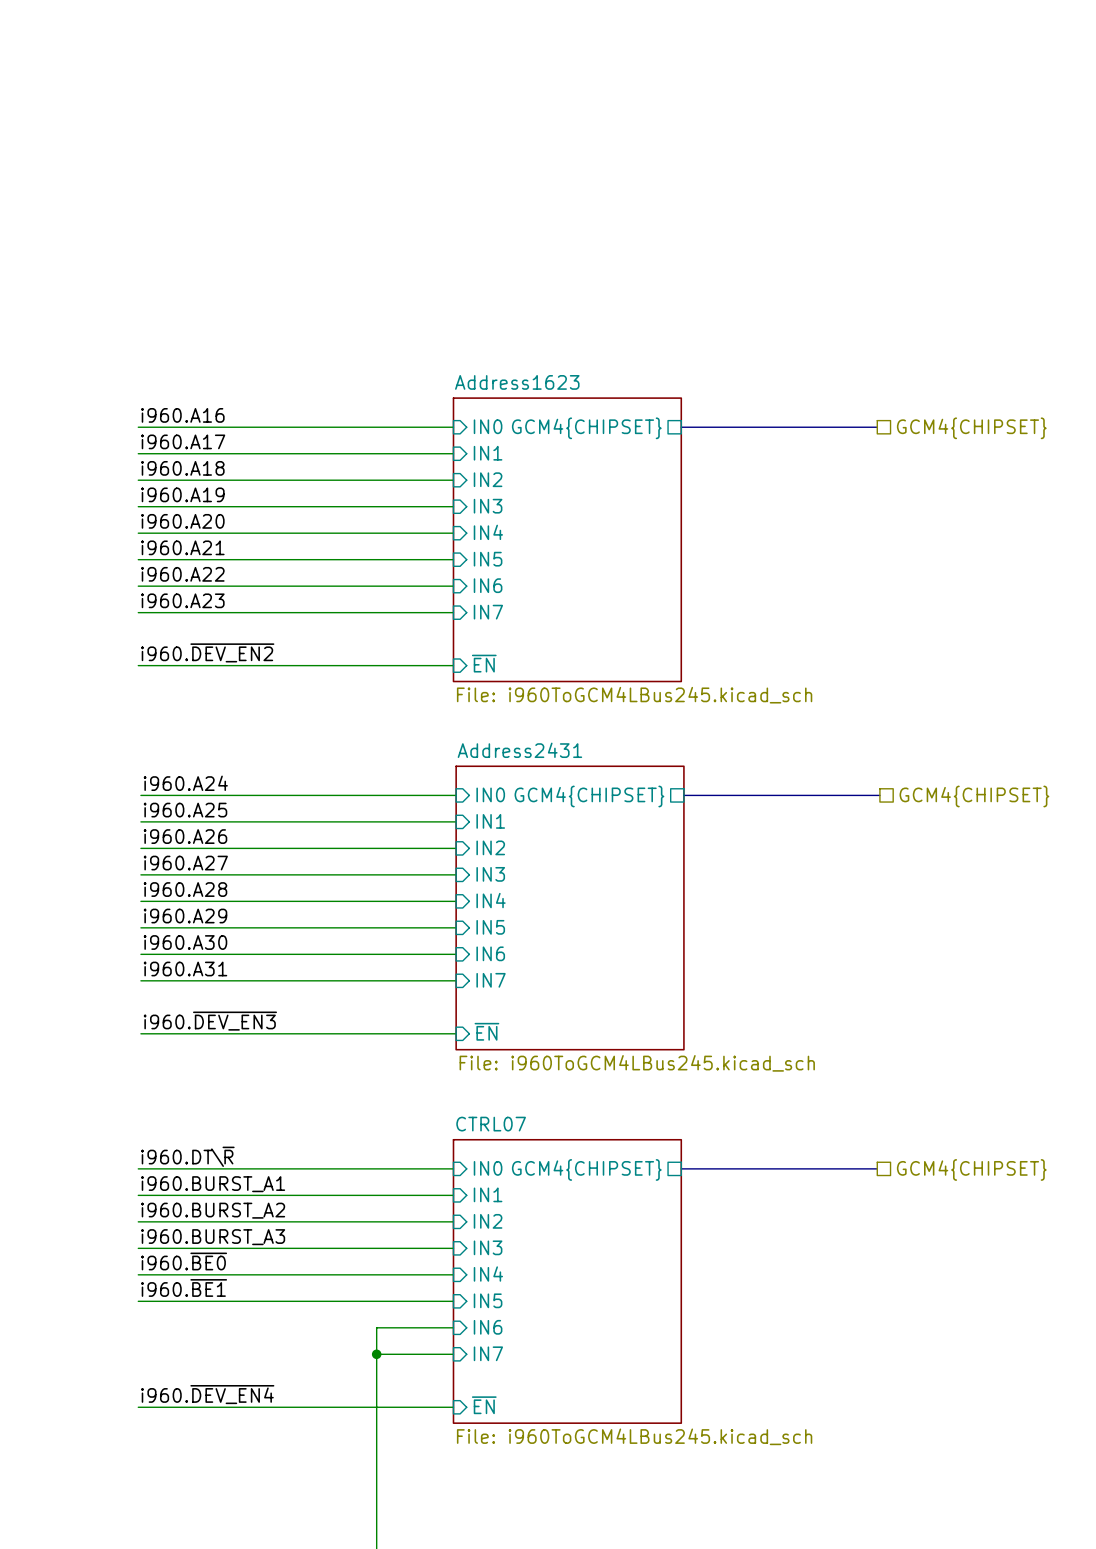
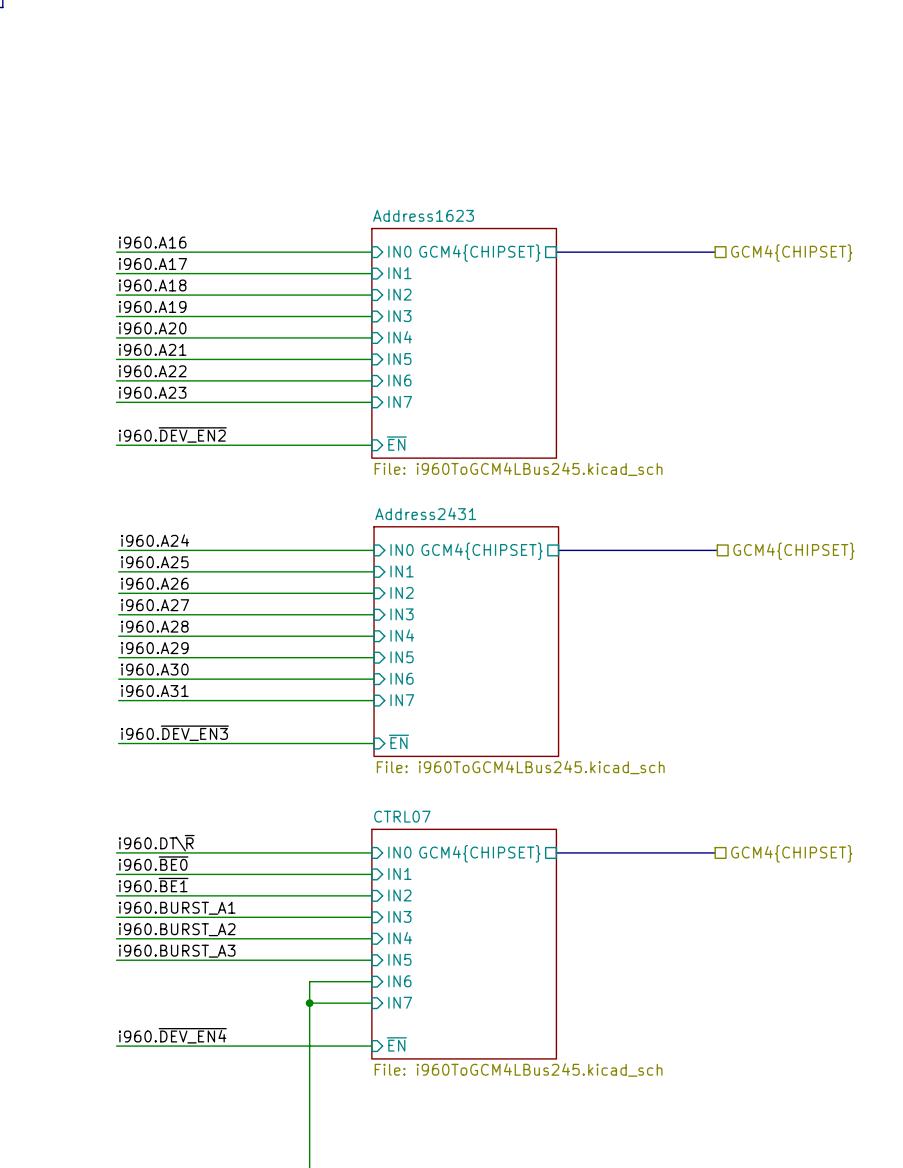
label: i960.BURST_A1 (213, 1184) -> i960.~{BE0} (153, 863)
label: i960.BURST_A2 (213, 1210) -> i960.~{BE1} (153, 885)
label: i960.BURST_A3 (213, 1237) -> i960.BURST_A1 (177, 908)
label: i960.~{BE0} (184, 1261) -> i960.BURST_A2 (177, 929)
label: i960.~{BE1} (184, 1287) -> i960.BURST_A3 (177, 951)

